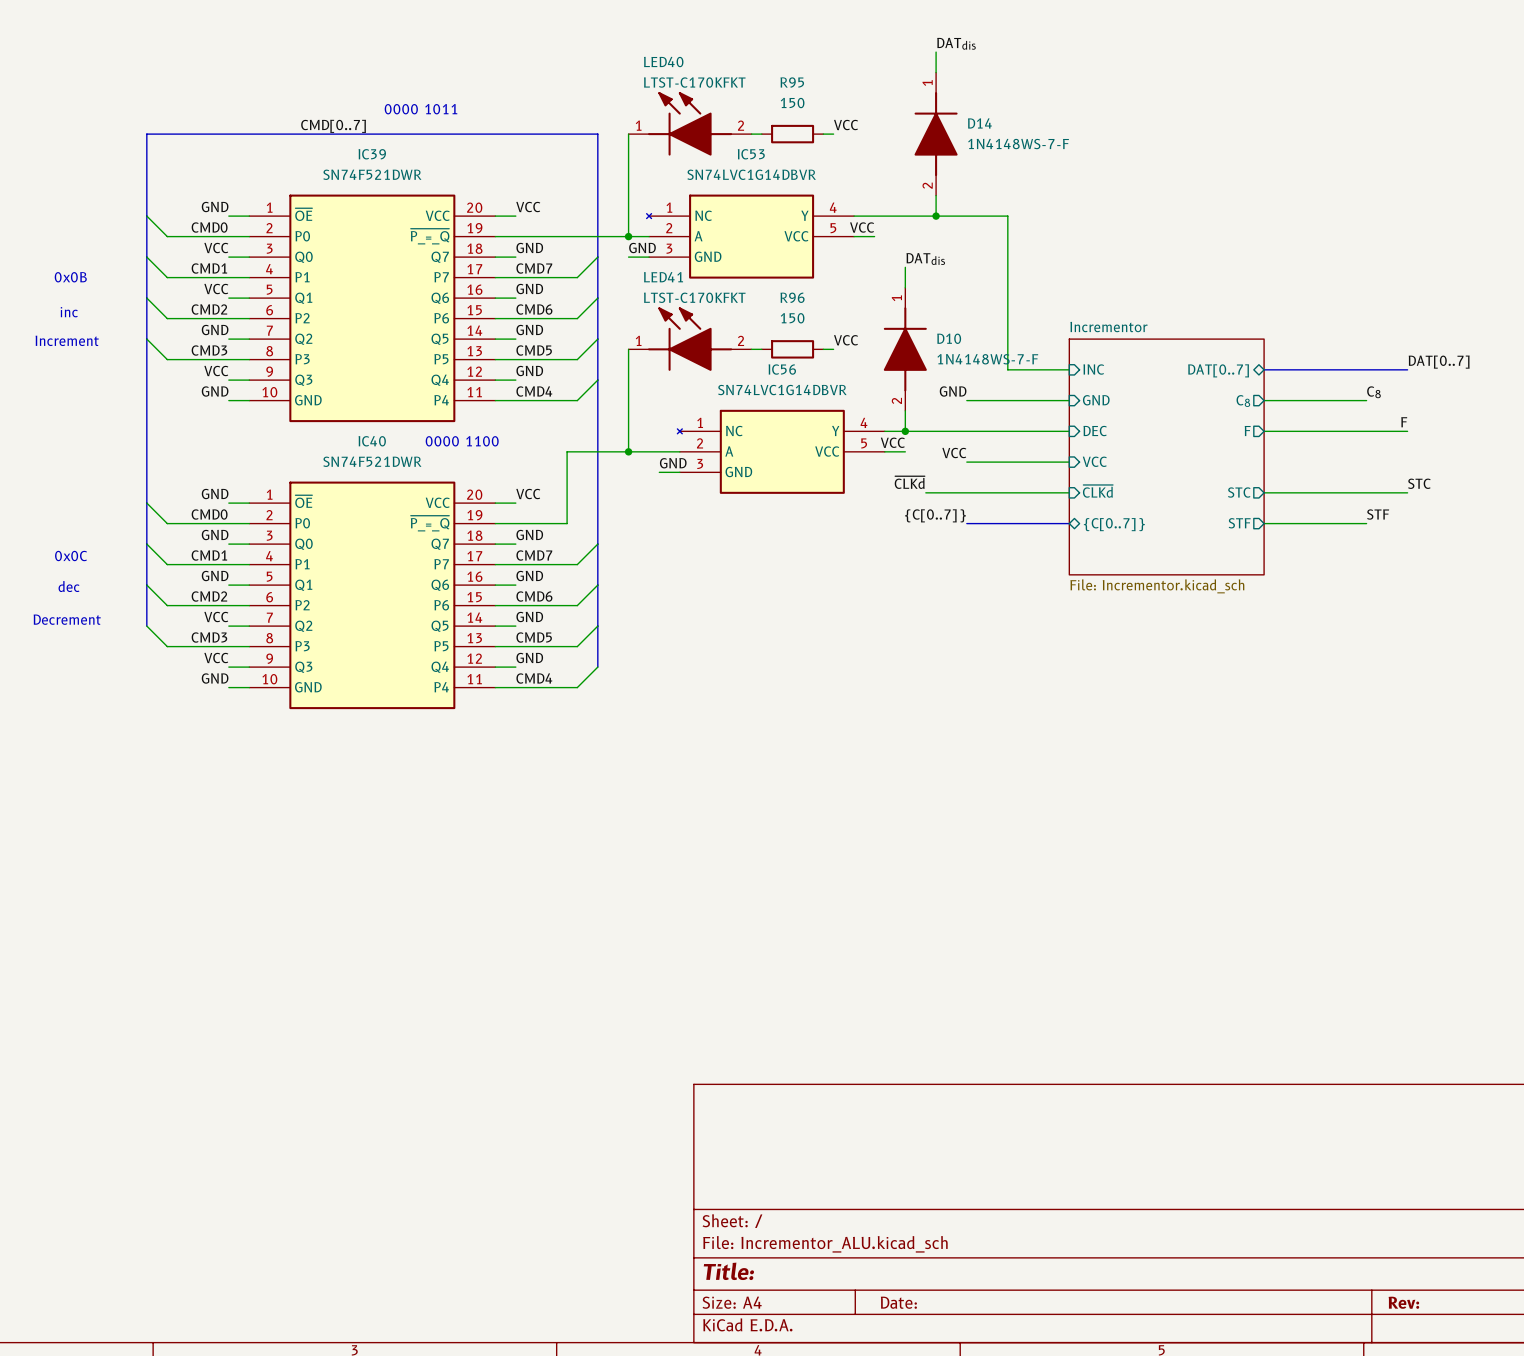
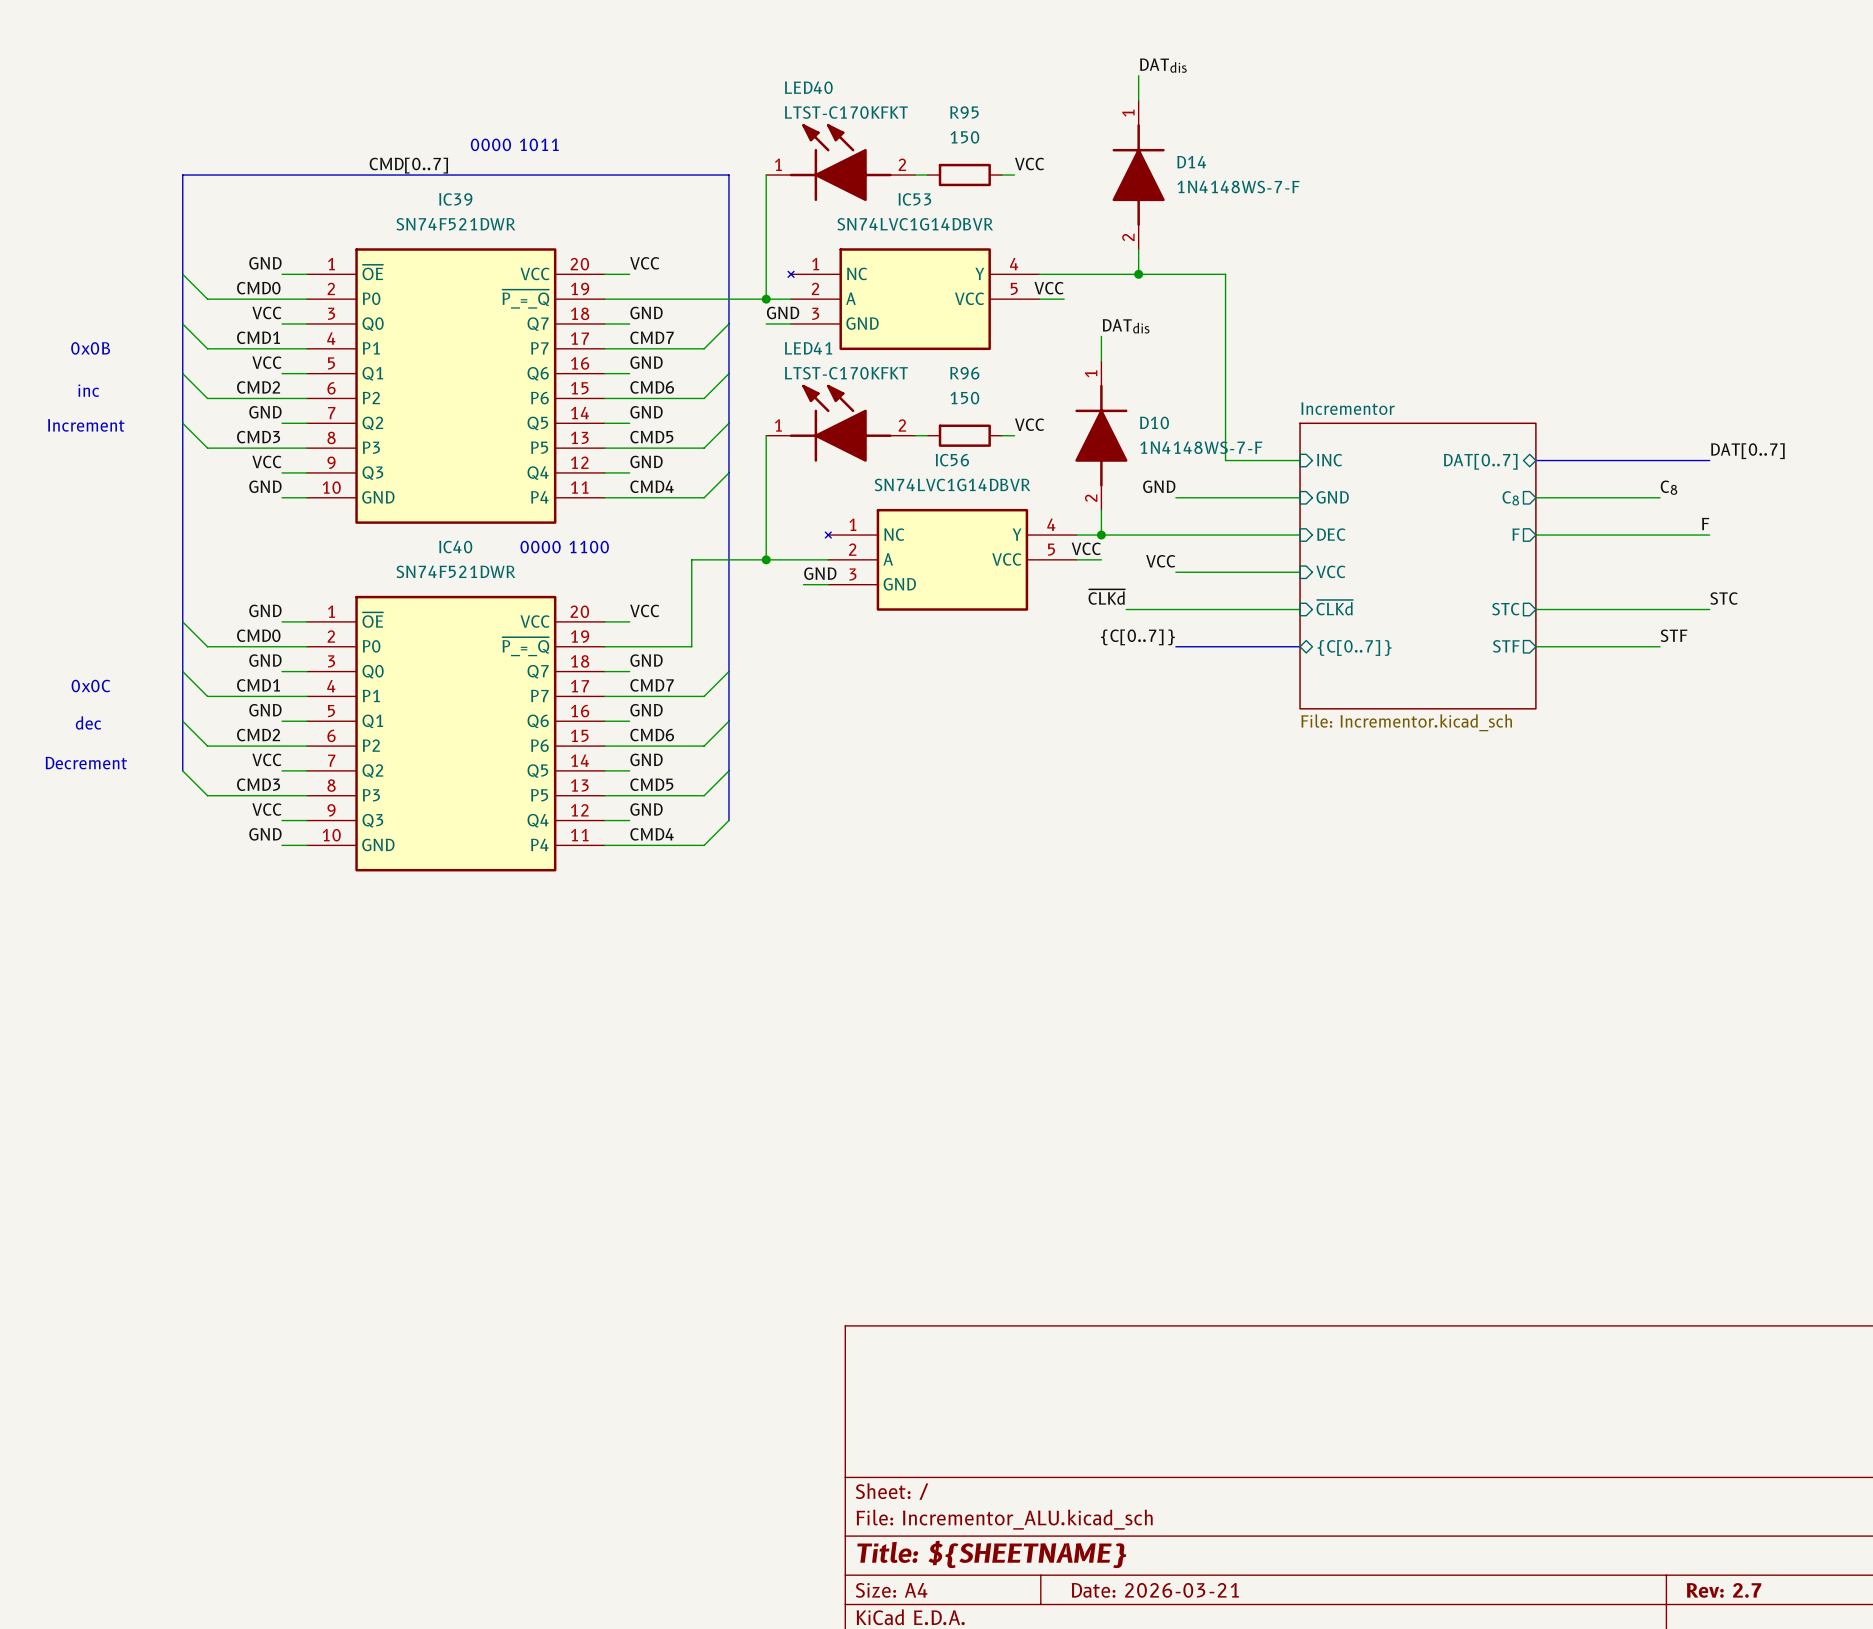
title block: Title: (728, 1271) -> Title: ${SHEETNAME} (991, 1554)
title block: Date: (898, 1302) -> Date: 2026-03-21 (1155, 1590)
title block: Rev: (1403, 1302) -> Rev: 2.7 (1724, 1590)

